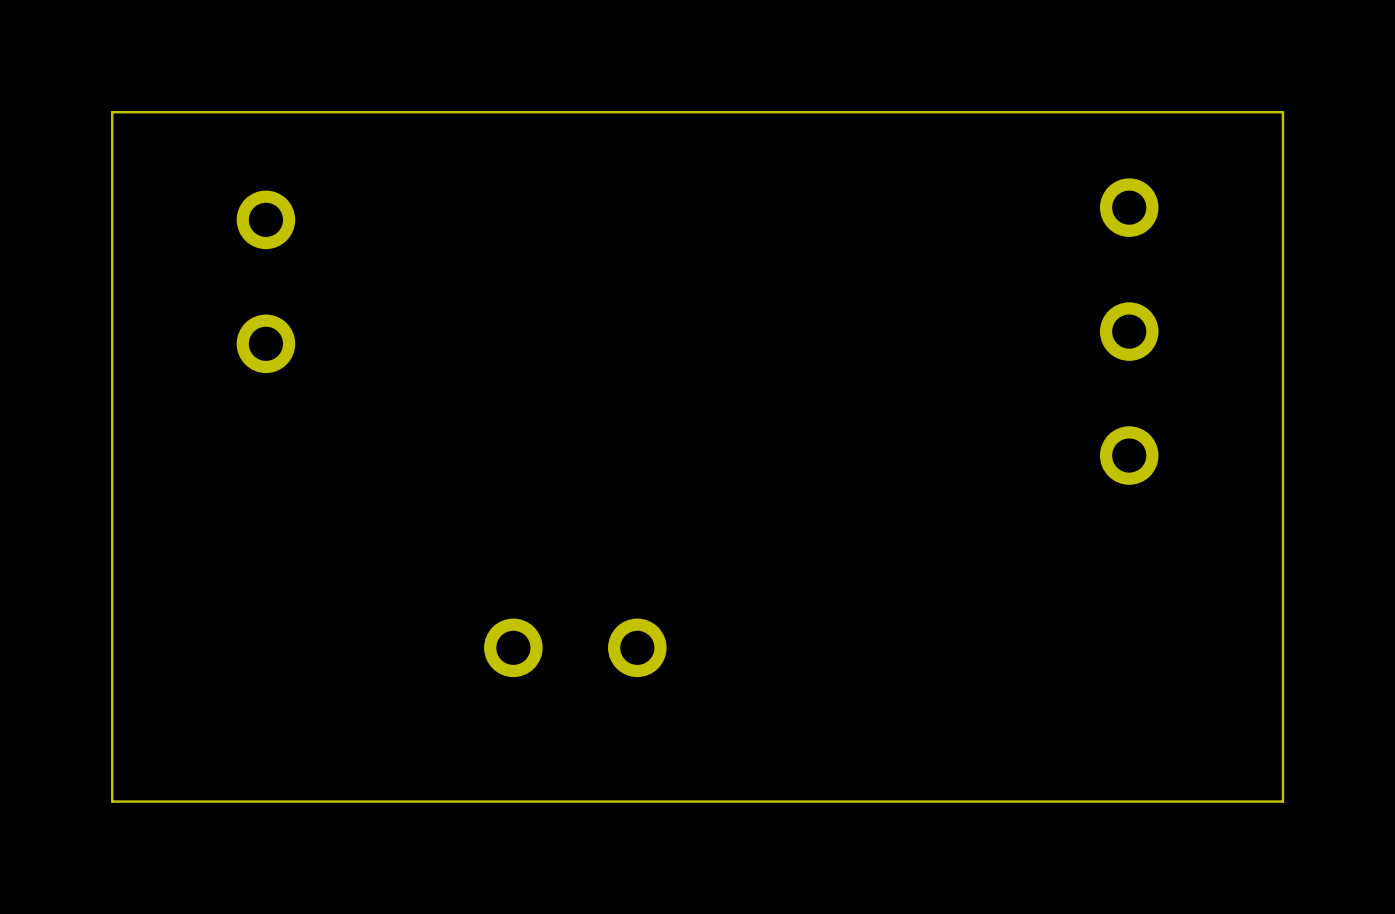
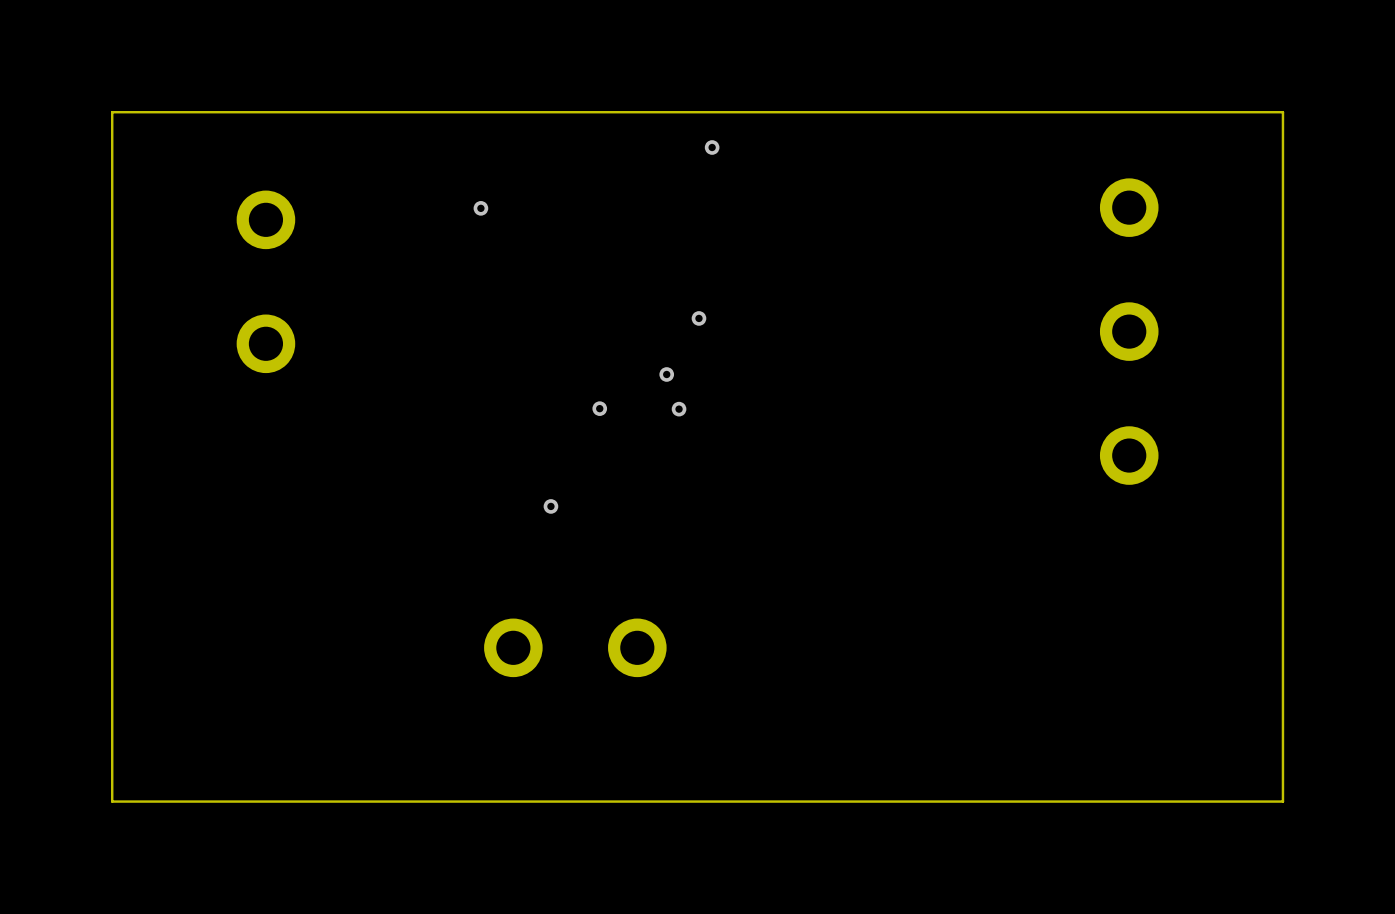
via: none -> (712, 147)
via: none -> (480, 208)
via: none -> (698, 318)
via: none -> (666, 374)
via: none -> (599, 408)
via: none -> (679, 409)
via: none -> (550, 506)

